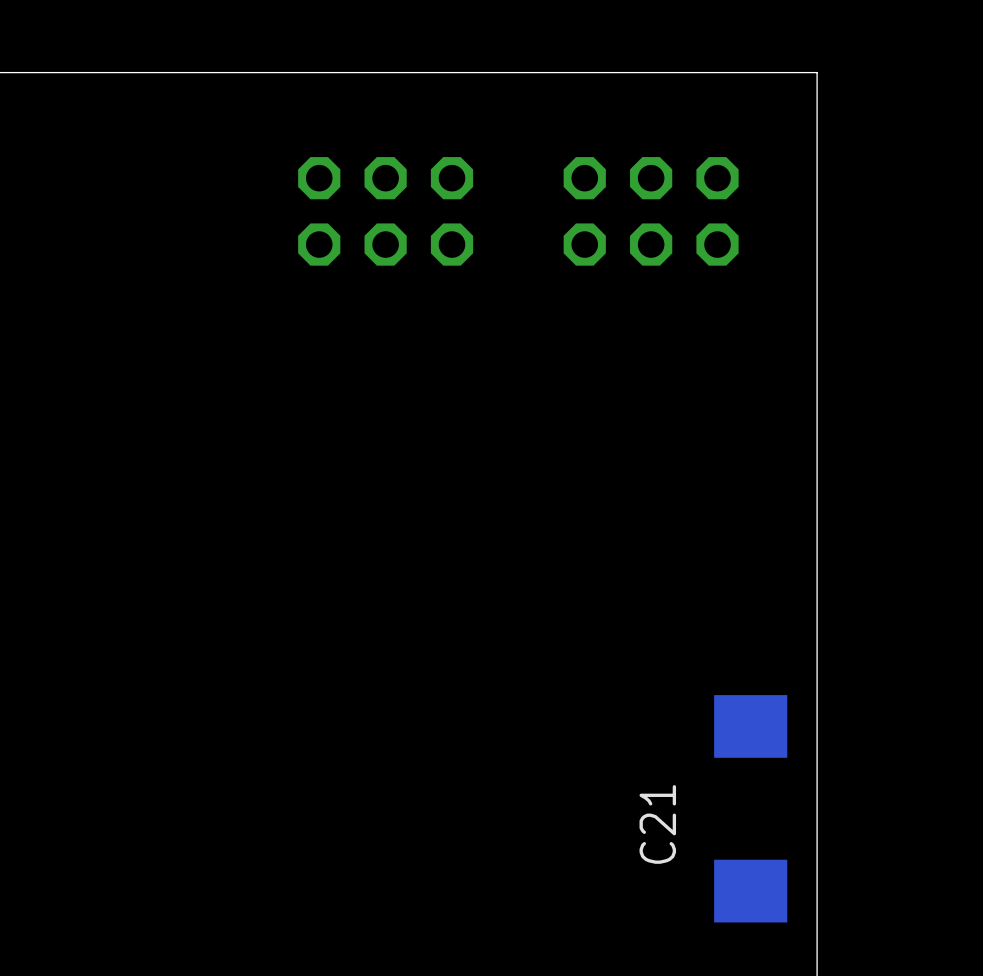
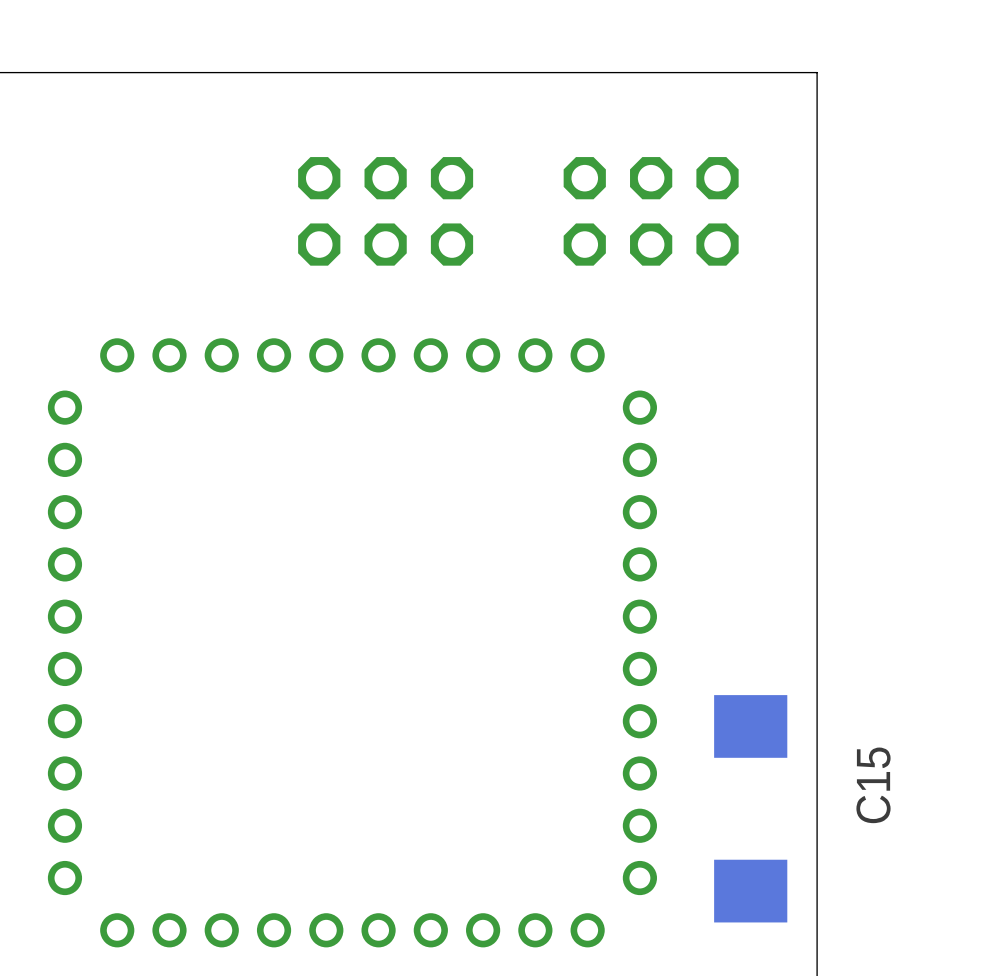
part: none -> (352, 642)
C21 name: C21 (657, 824) -> C15 (873, 785)

